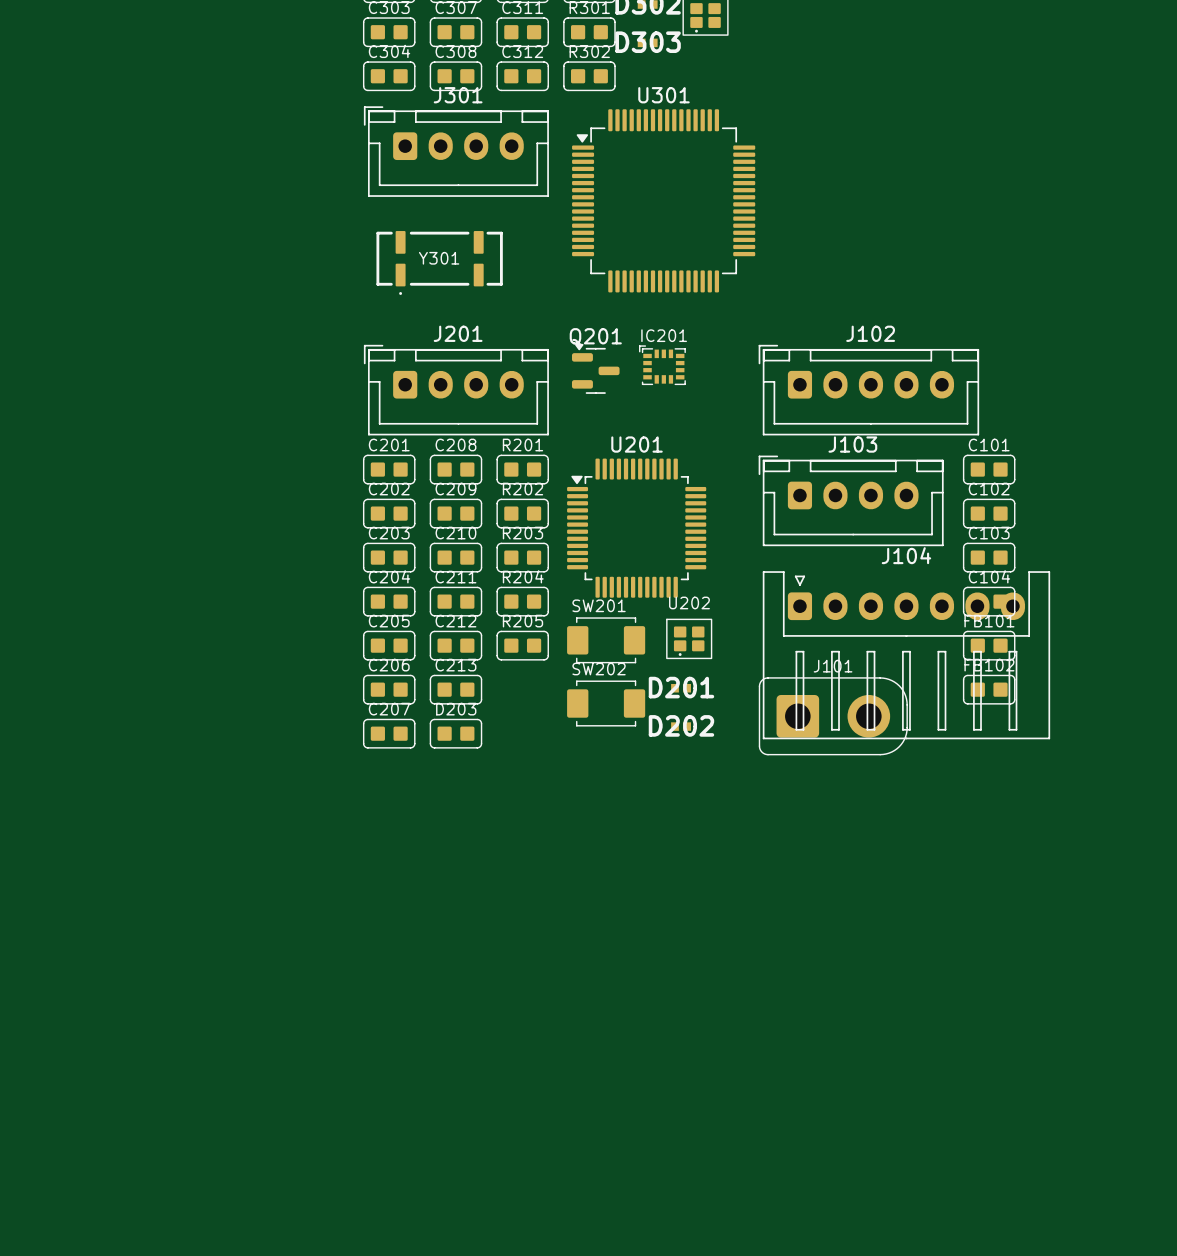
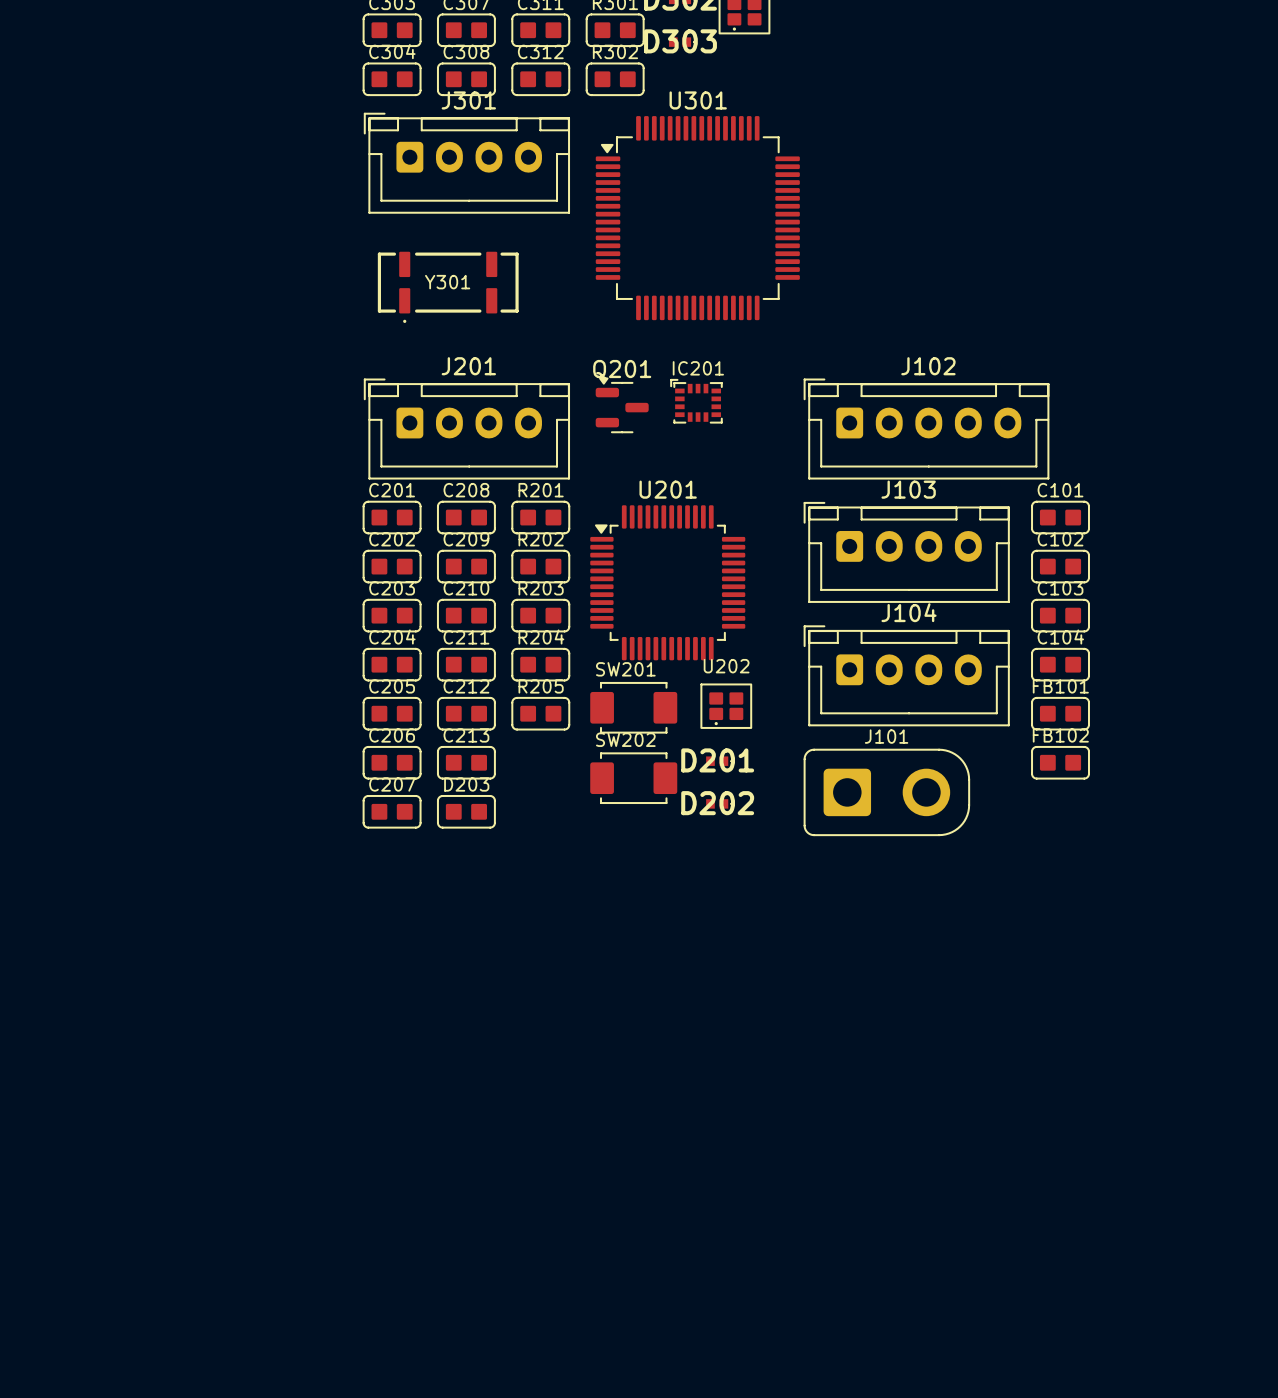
J104 name position: J104 (906, 555) -> J104 (909, 612)
J104 footprint: [762, 571, 1051, 740] -> [803, 625, 1010, 727]

